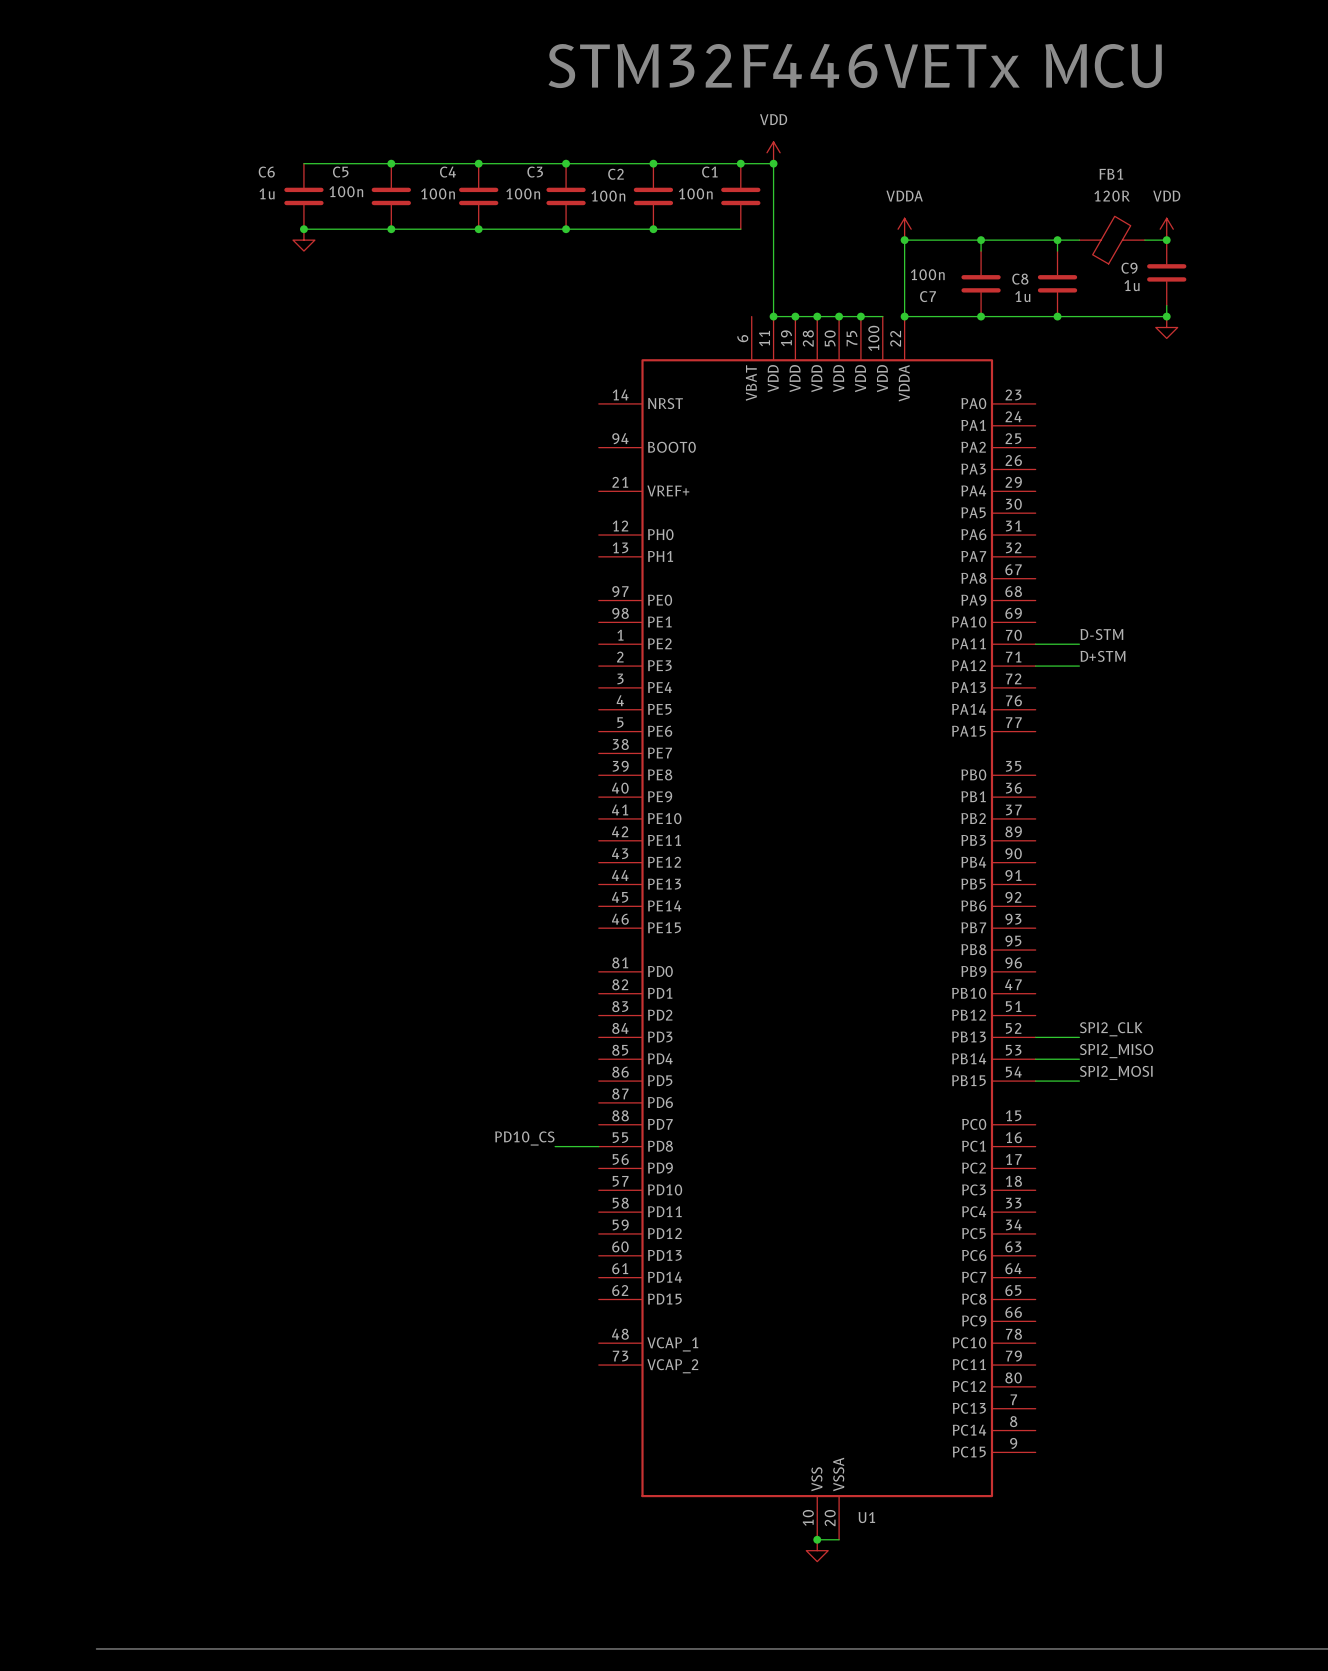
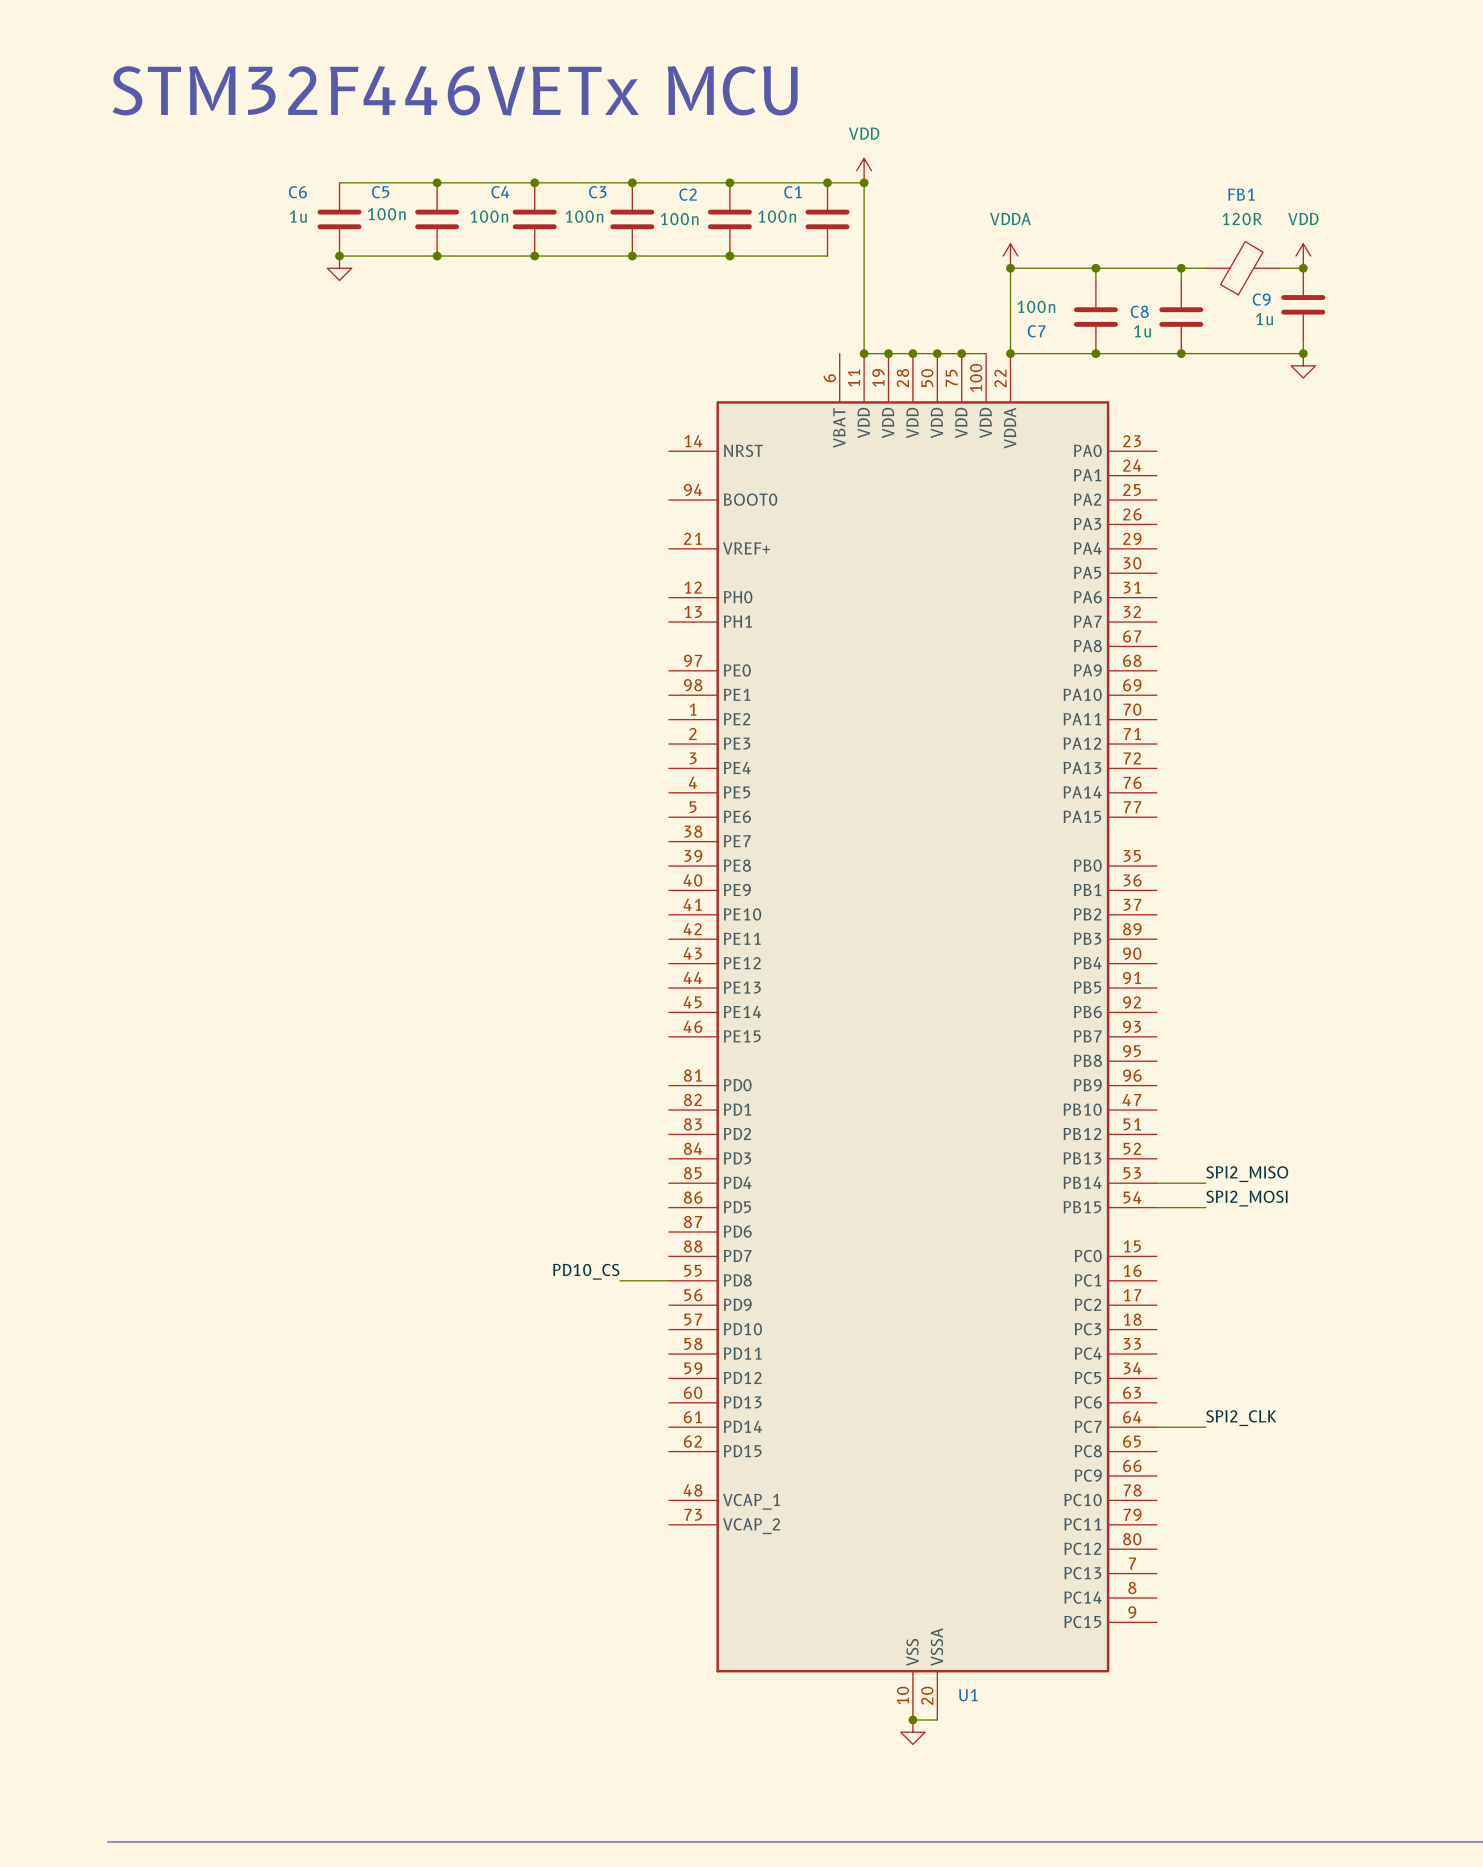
text: STM32F446VETx MCU (855, 66) -> none
text: none -> STM32F446VETx MCU (455, 90)
label: D-STM (1101, 634) -> none
wire: (1035, 644) (1079, 644) -> none
label: D+STM (1102, 656) -> none
wire: (1035, 666) (1079, 666) -> none
label: SPI2_CLK (1111, 1029) -> none
wire: (1035, 1037) (1079, 1037) -> none
label: none -> SPI2_CLK (1241, 1418)
wire: none -> (1156, 1427) (1205, 1427)

